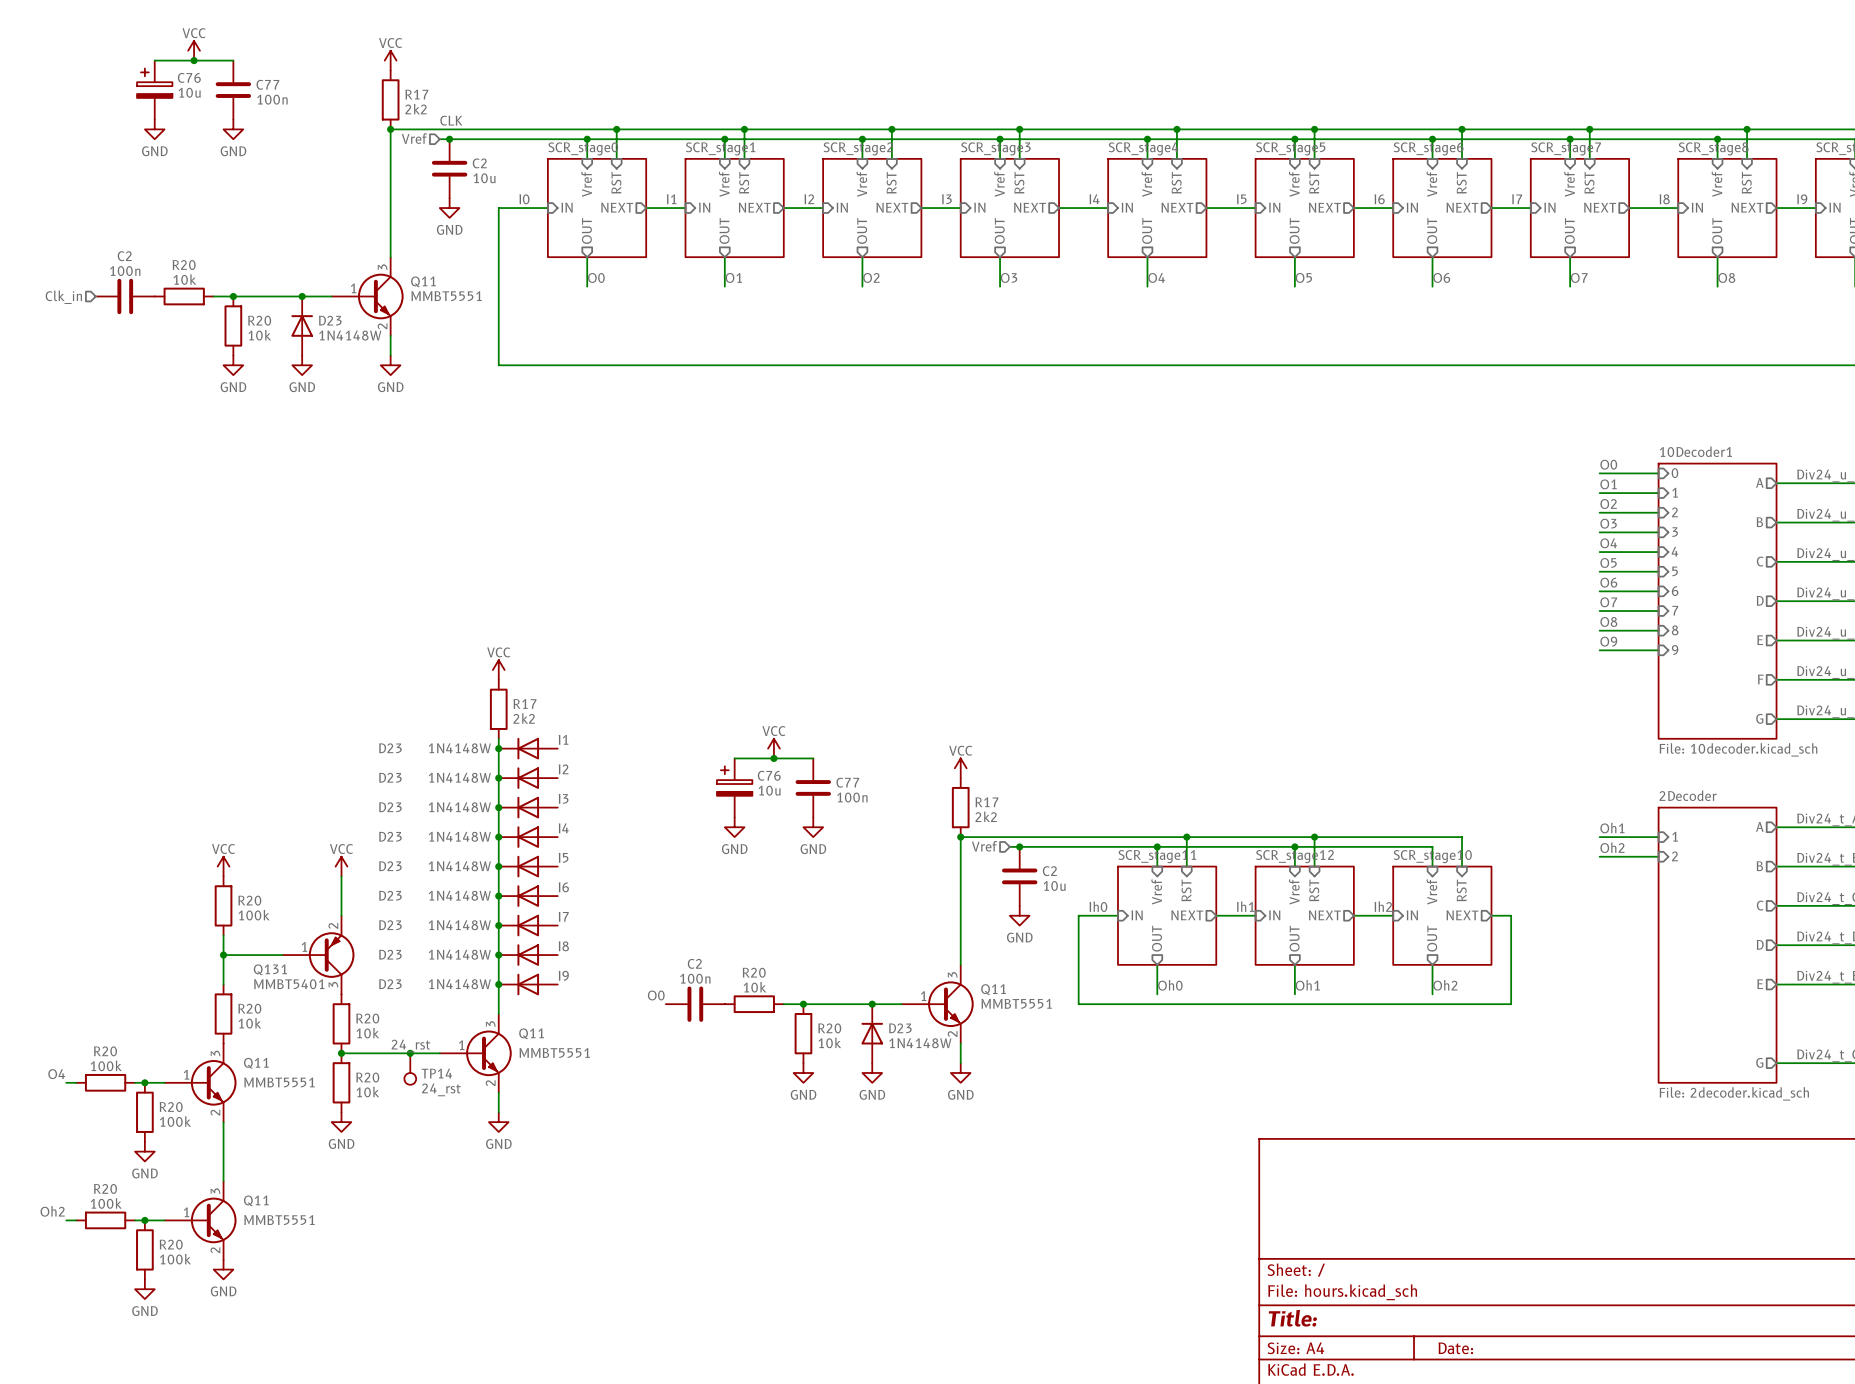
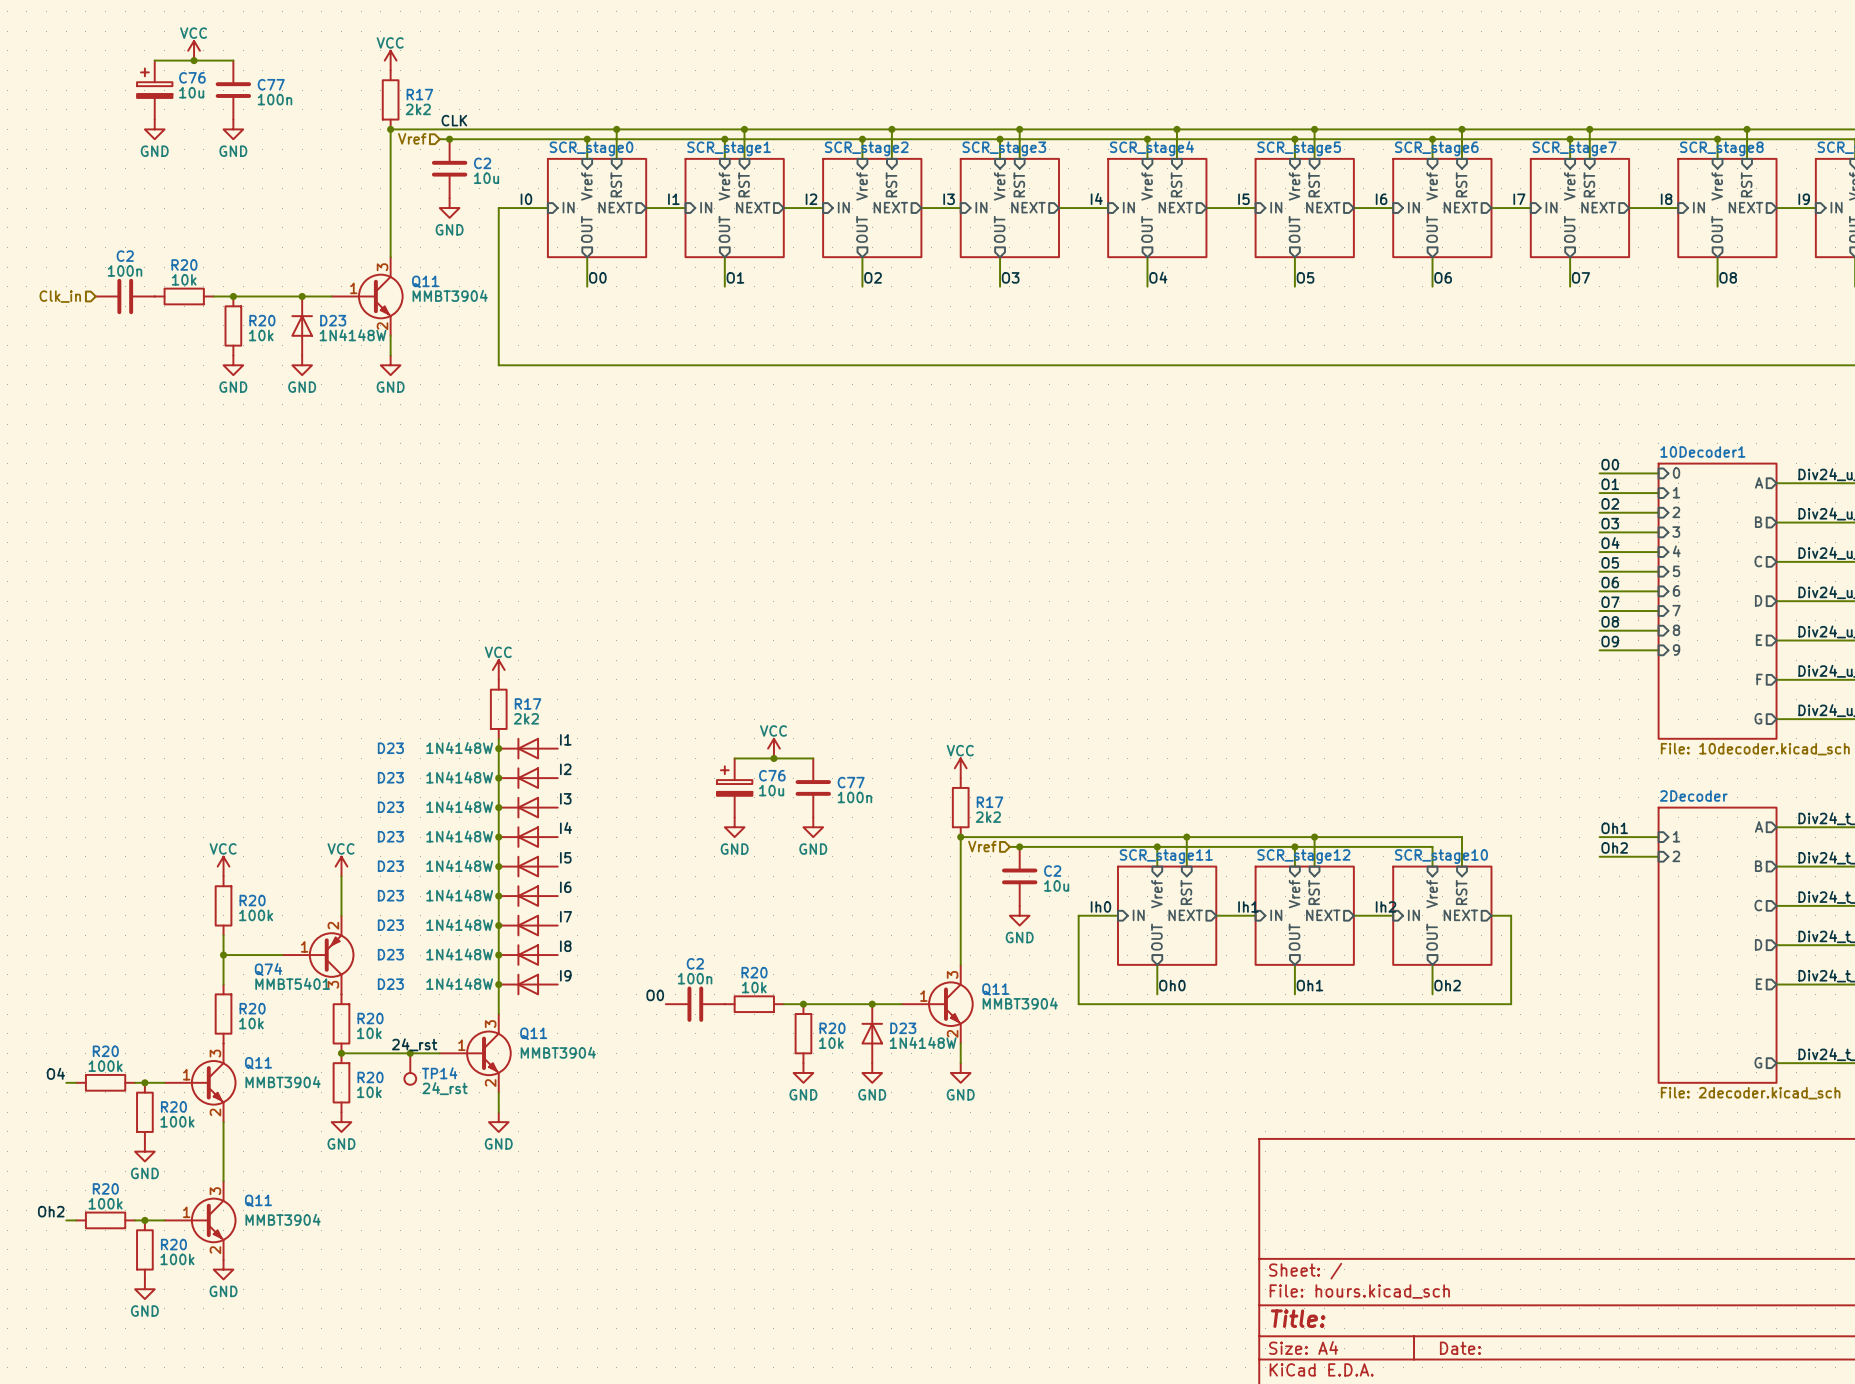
Q11 value: MMBT5551 (446, 296) -> MMBT3904 (450, 295)
Q131 name: Q131 (270, 969) -> Q74 (268, 969)
Q11 value: MMBT5551 (1016, 1003) -> MMBT3904 (1020, 1003)
Q11 value: MMBT5551 (554, 1052) -> MMBT3904 (558, 1052)
Q11 value: MMBT5551 (279, 1082) -> MMBT3904 (283, 1082)
Q11 value: MMBT5551 (279, 1220) -> MMBT3904 (283, 1219)

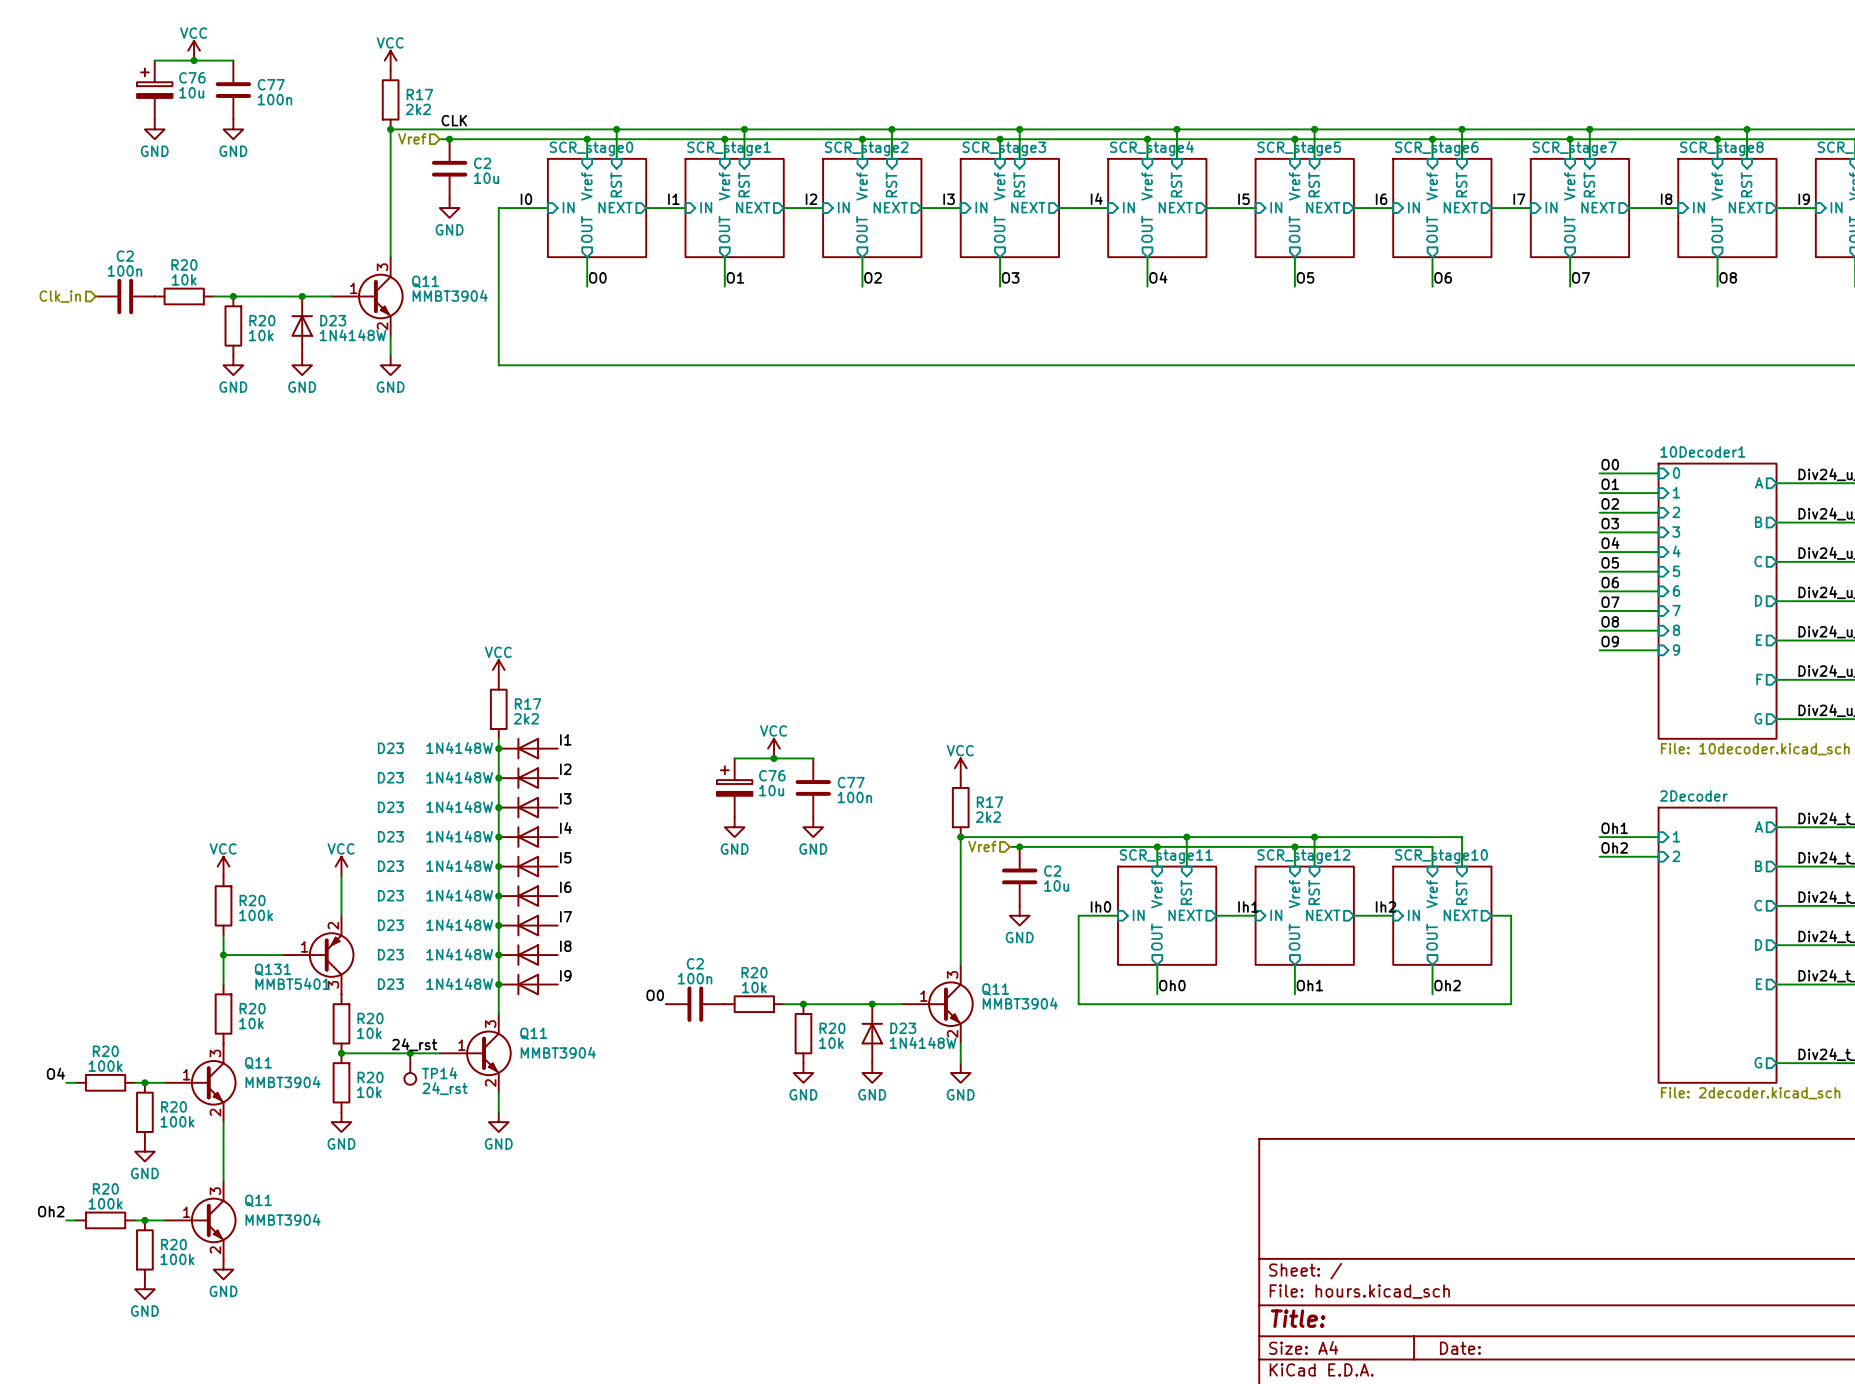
Q74 name: Q74 (268, 969) -> Q131 (272, 969)

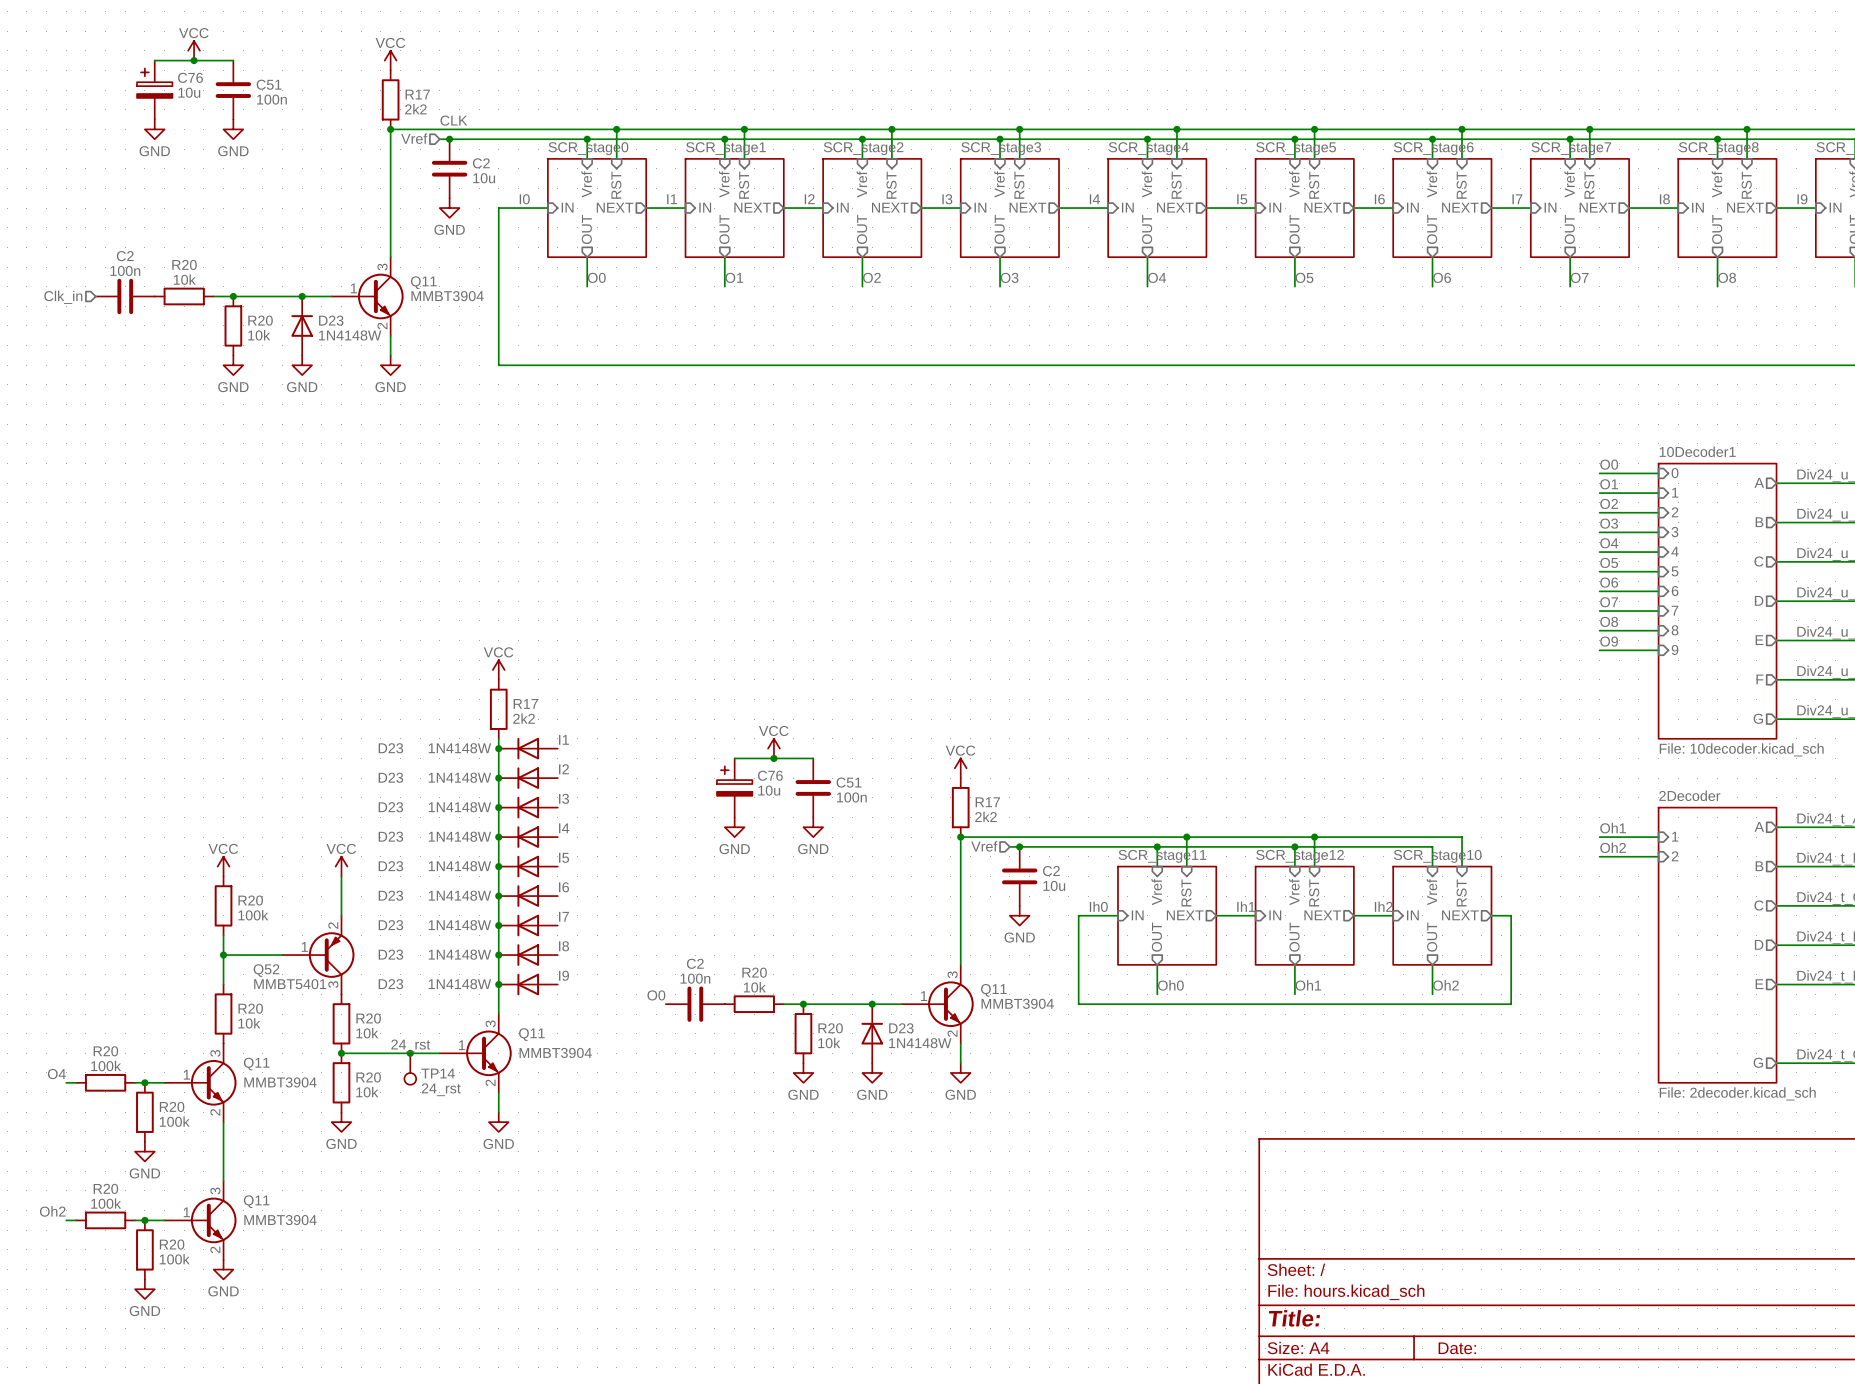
C77 name: C77 (271, 84) -> C51 (269, 84)
C77 name: C77 (851, 782) -> C51 (849, 782)
Q131 name: Q131 (272, 969) -> Q52 (266, 970)

